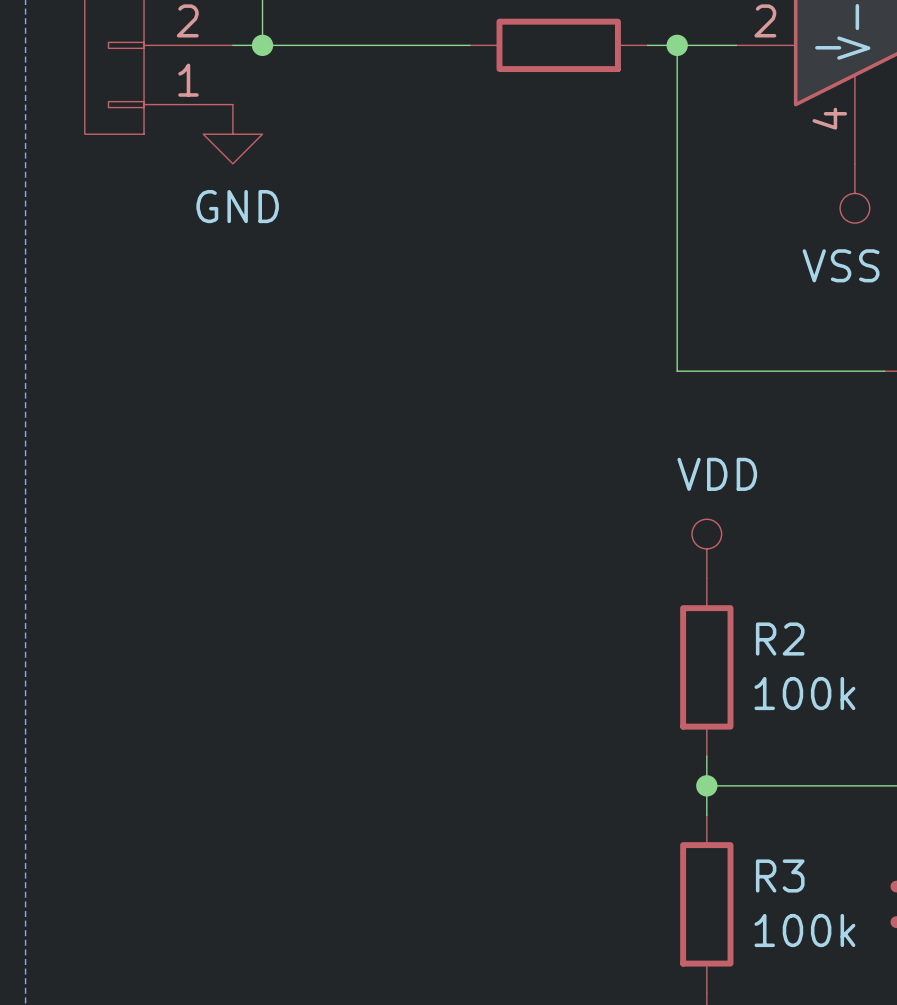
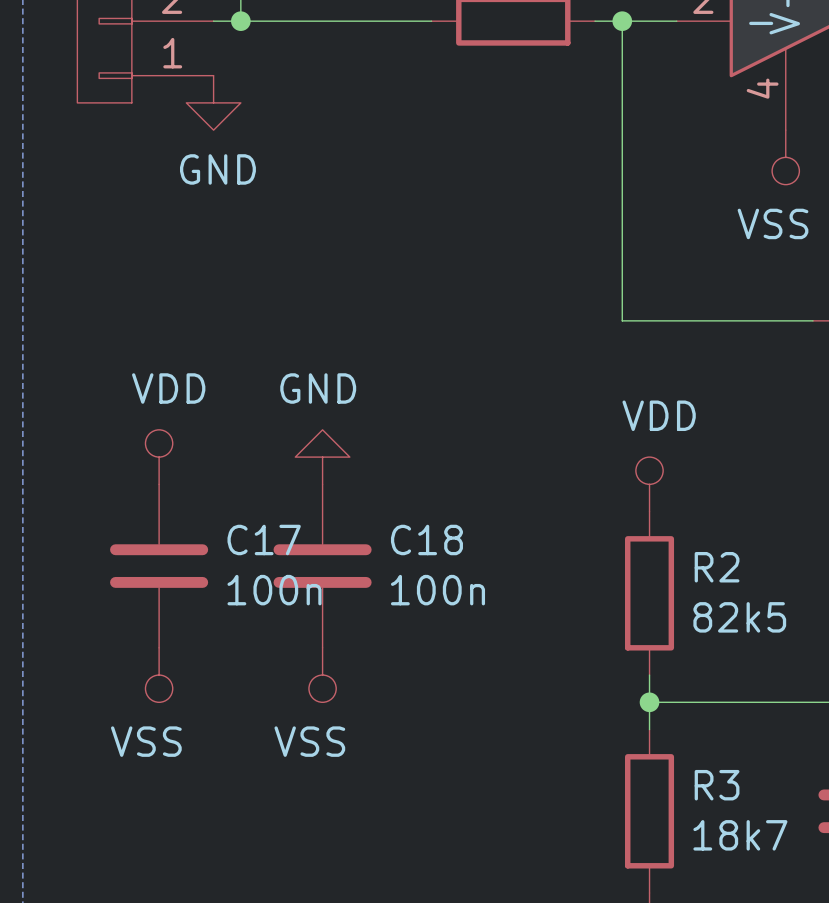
power symbol: none -> VDD (159, 457)
power symbol: none -> GND (322, 457)
C17: none -> 100n (159, 566)
C18: none -> 100n (322, 566)
R2 value: 100k (804, 693) -> 82k5 (739, 617)
power symbol: none -> VSS (159, 675)
power symbol: none -> VSS (322, 675)
R3 value: 100k (804, 930) -> 18k7 (740, 835)

